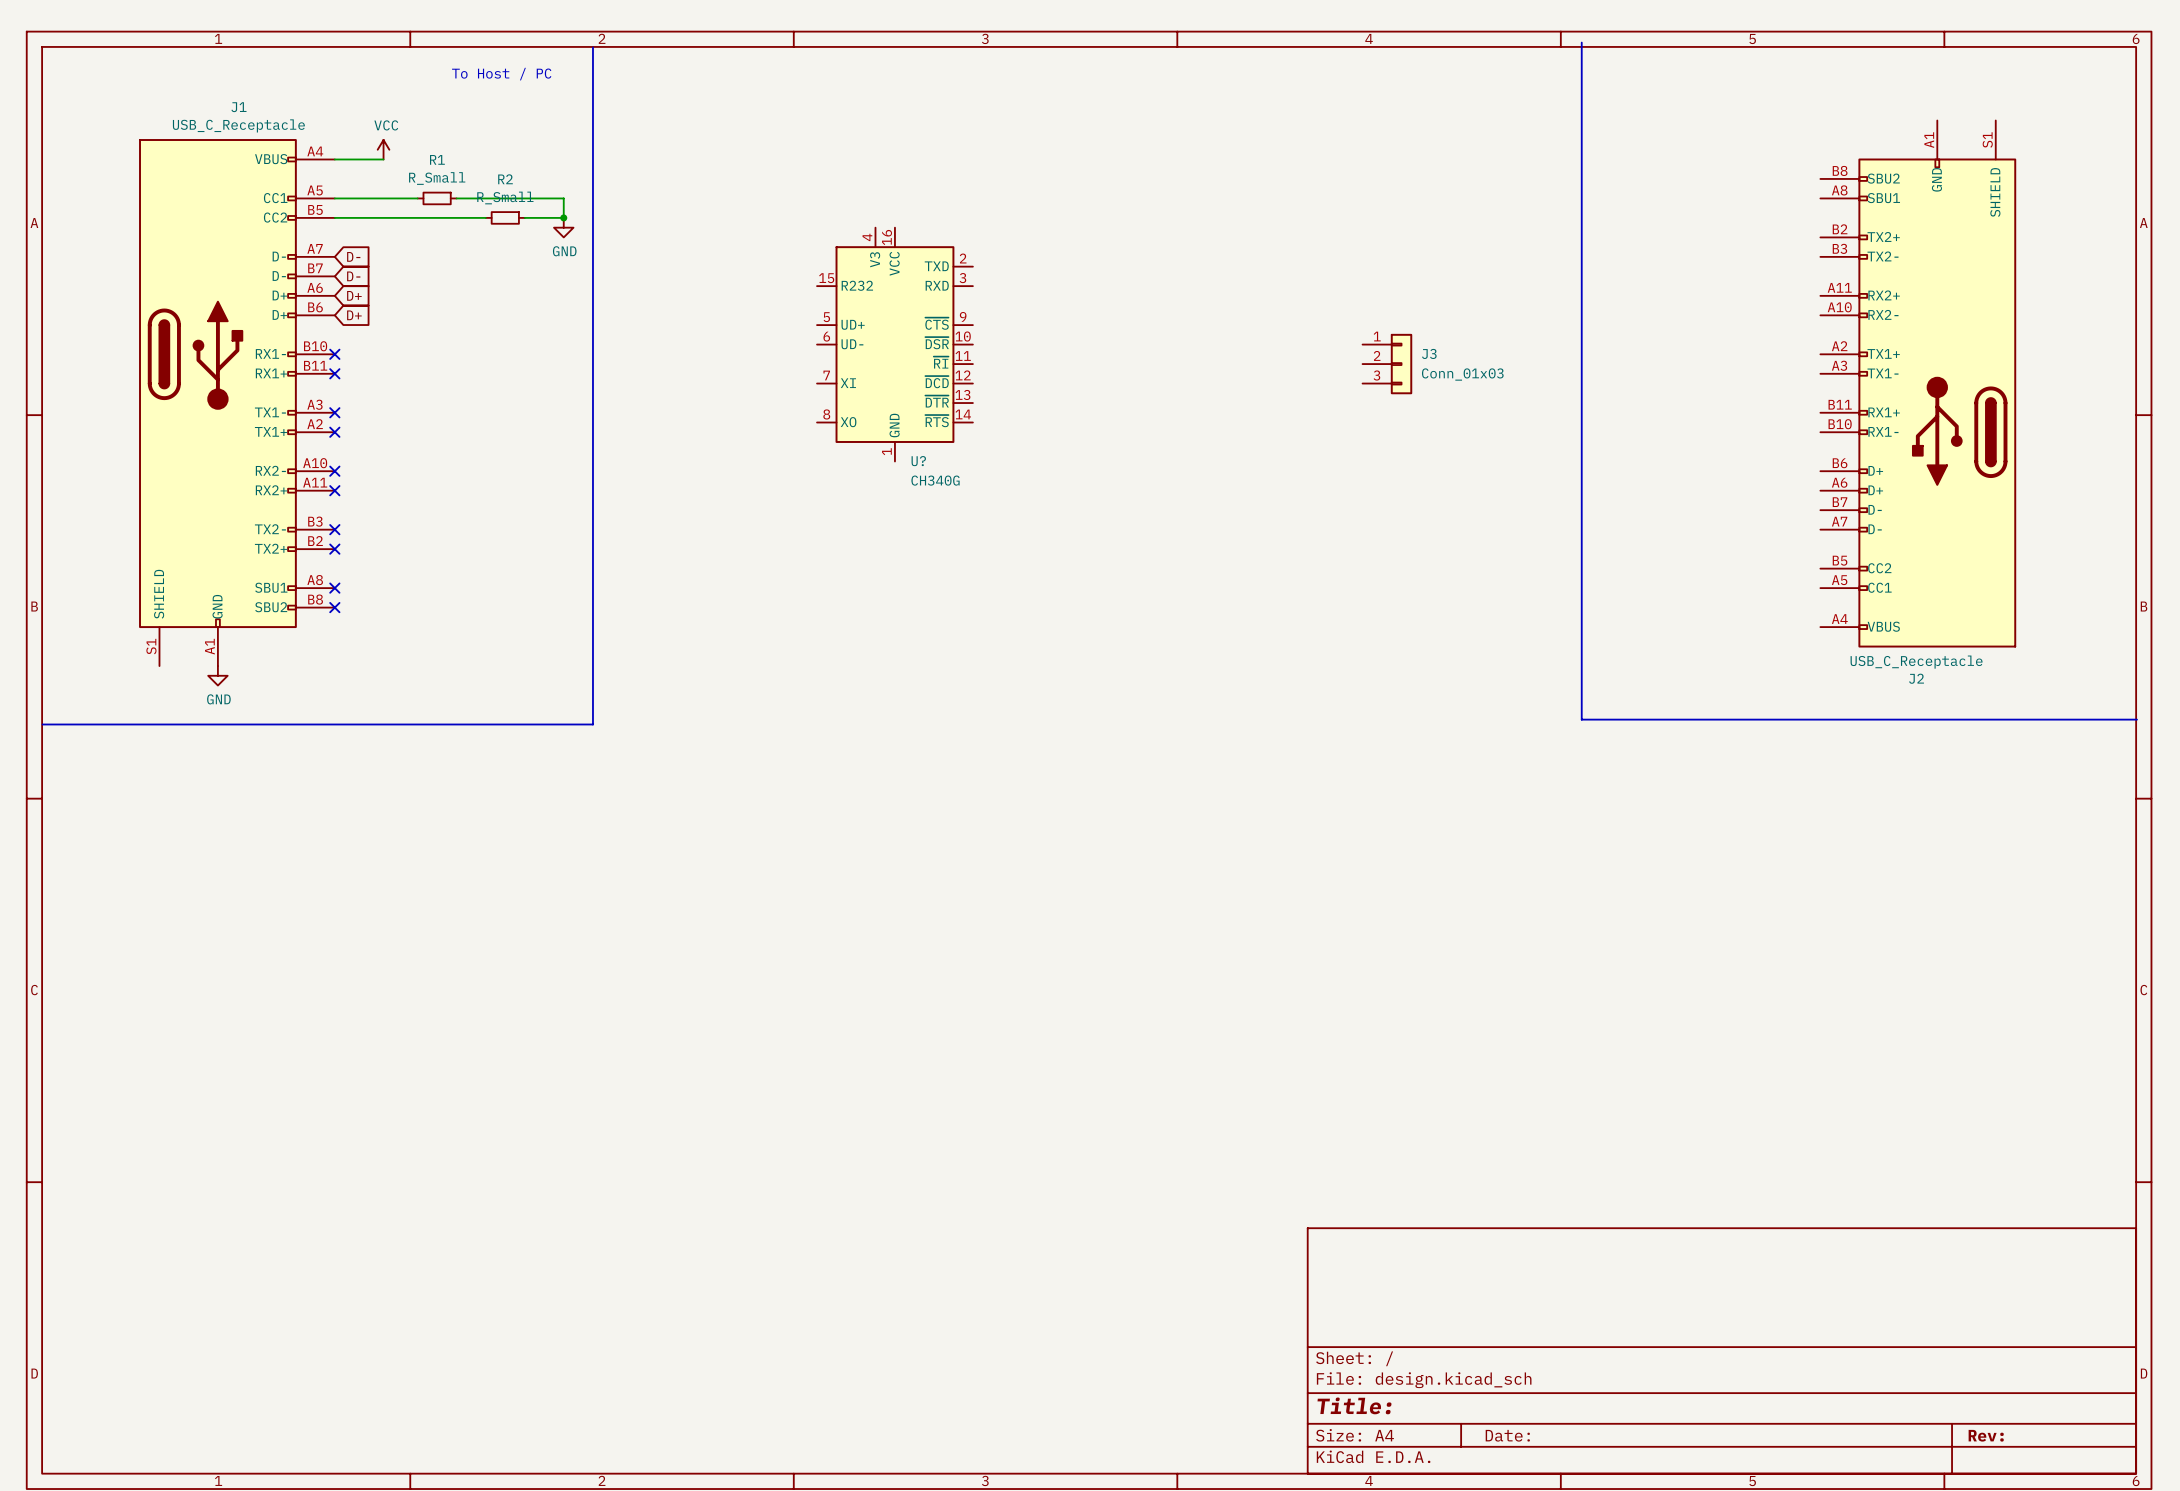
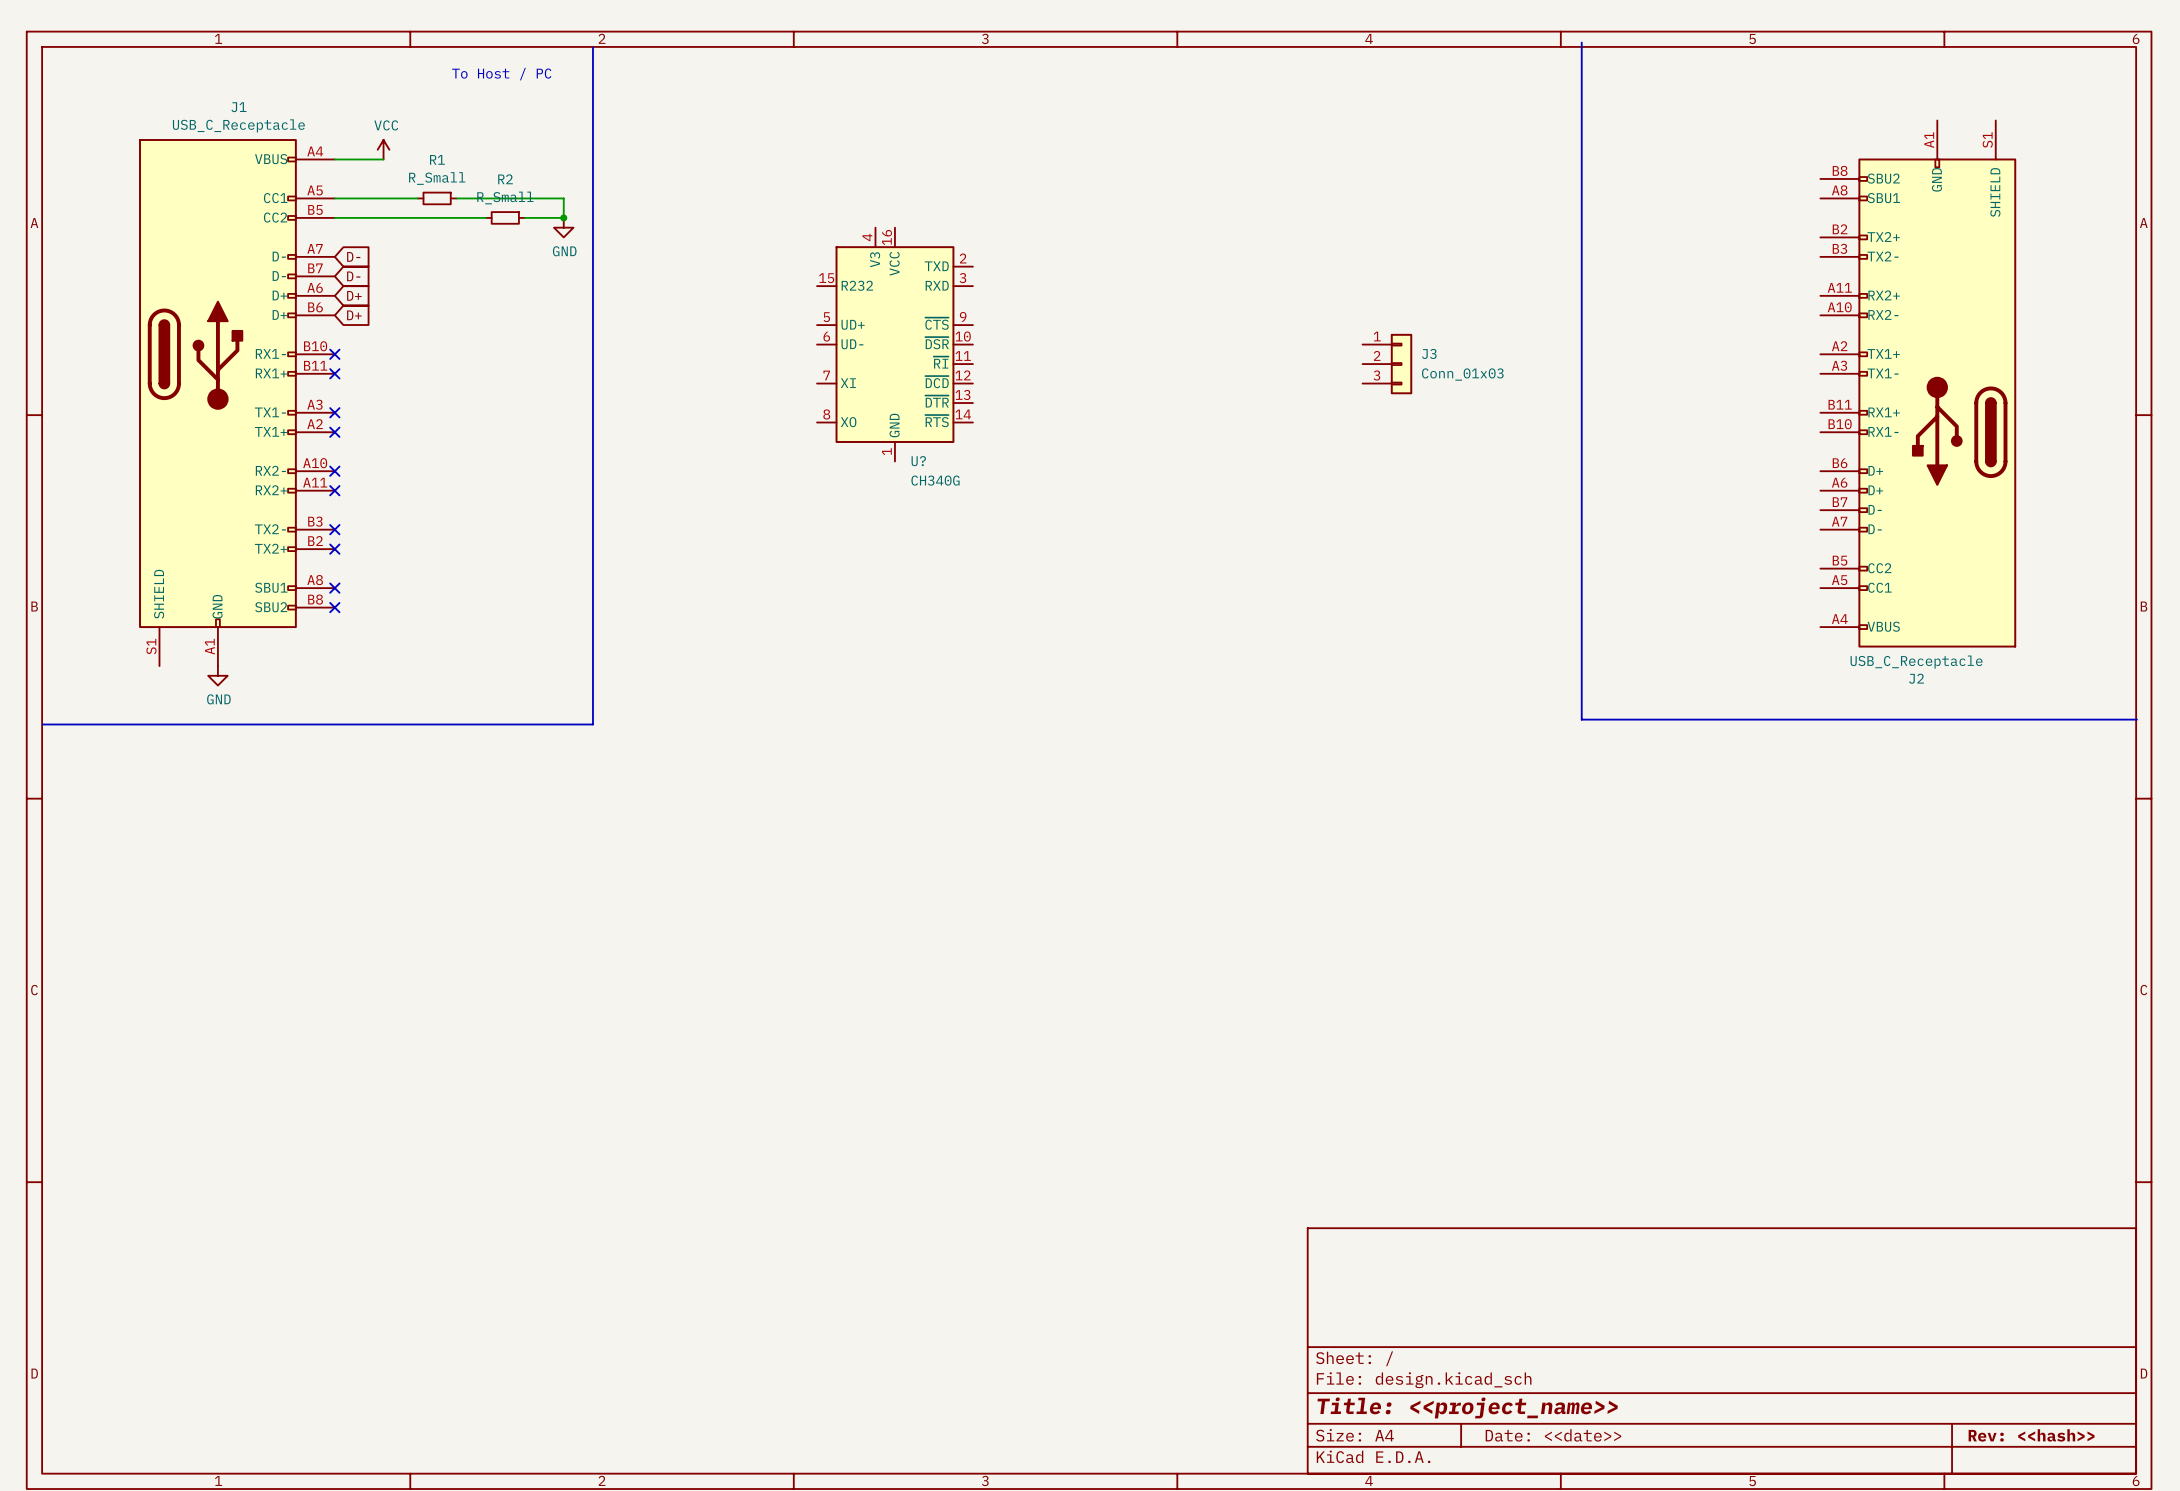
title block: Title: (1354, 1405) -> Title: <<project_name>> (1467, 1407)
title block: Date: (1507, 1435) -> Date: <<date>> (1553, 1435)
title block: Rev: (1986, 1435) -> Rev: <<hash>> (2031, 1435)

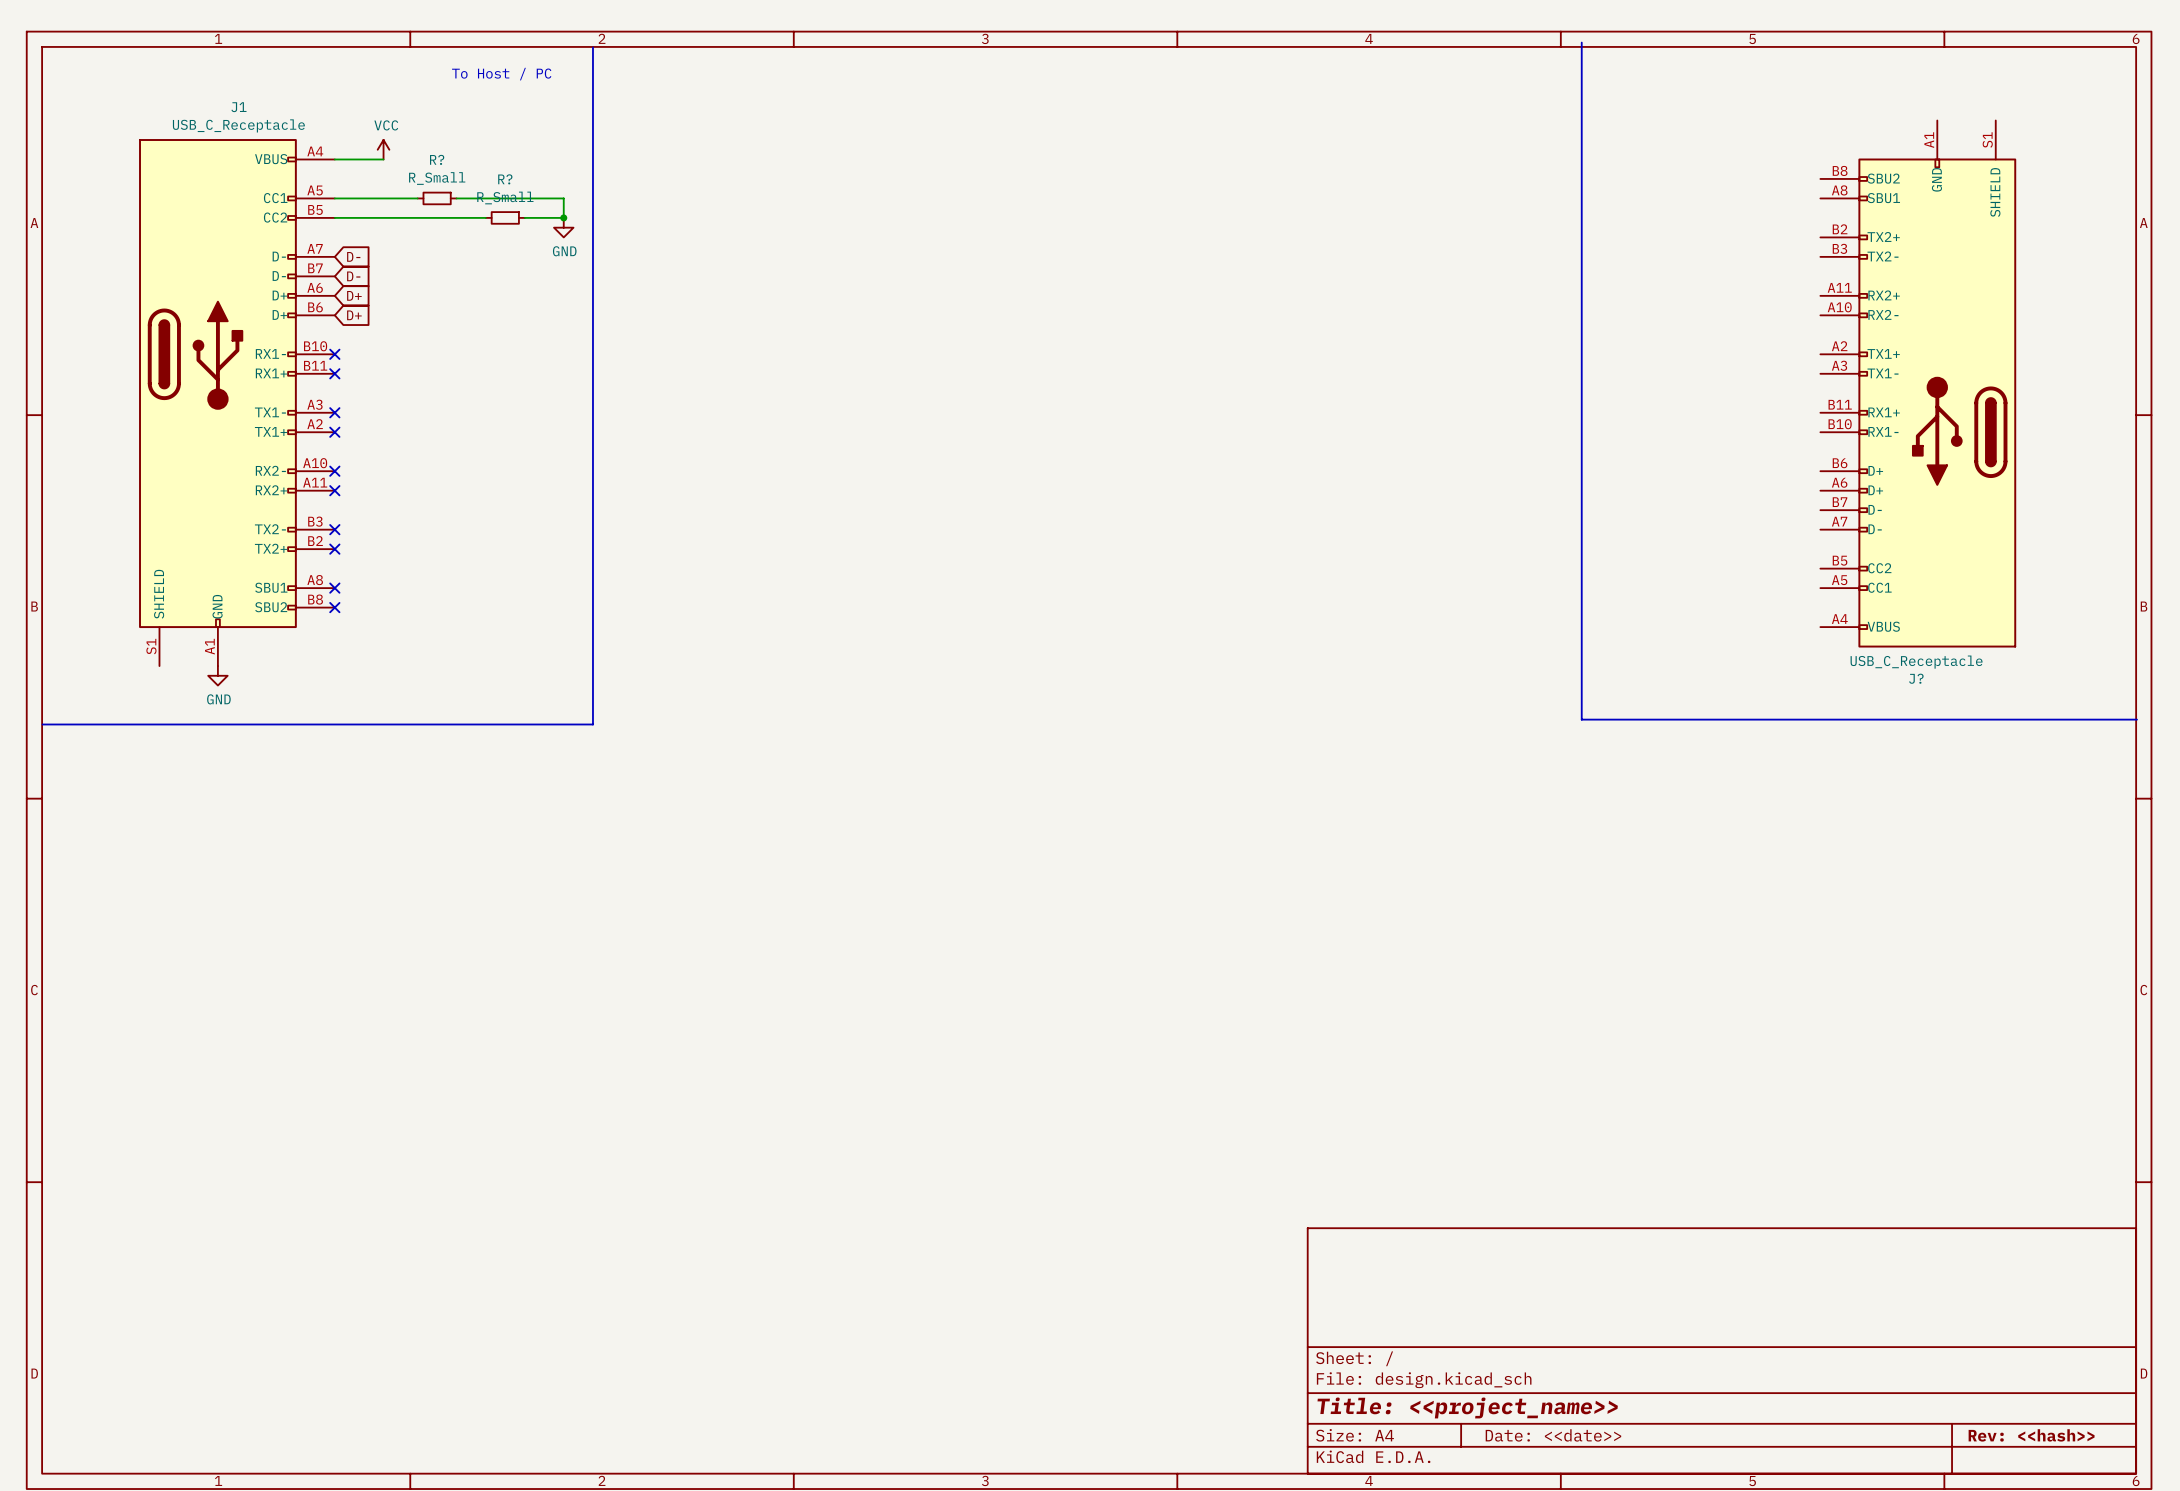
R1 name: R1 (437, 159) -> R? (437, 159)
R2 name: R2 (505, 179) -> R? (505, 179)
U?: CH340G (894, 344) -> none
J3: Conn_01x03 (1387, 364) -> none
J2 name: J2 (1916, 678) -> J? (1916, 678)

